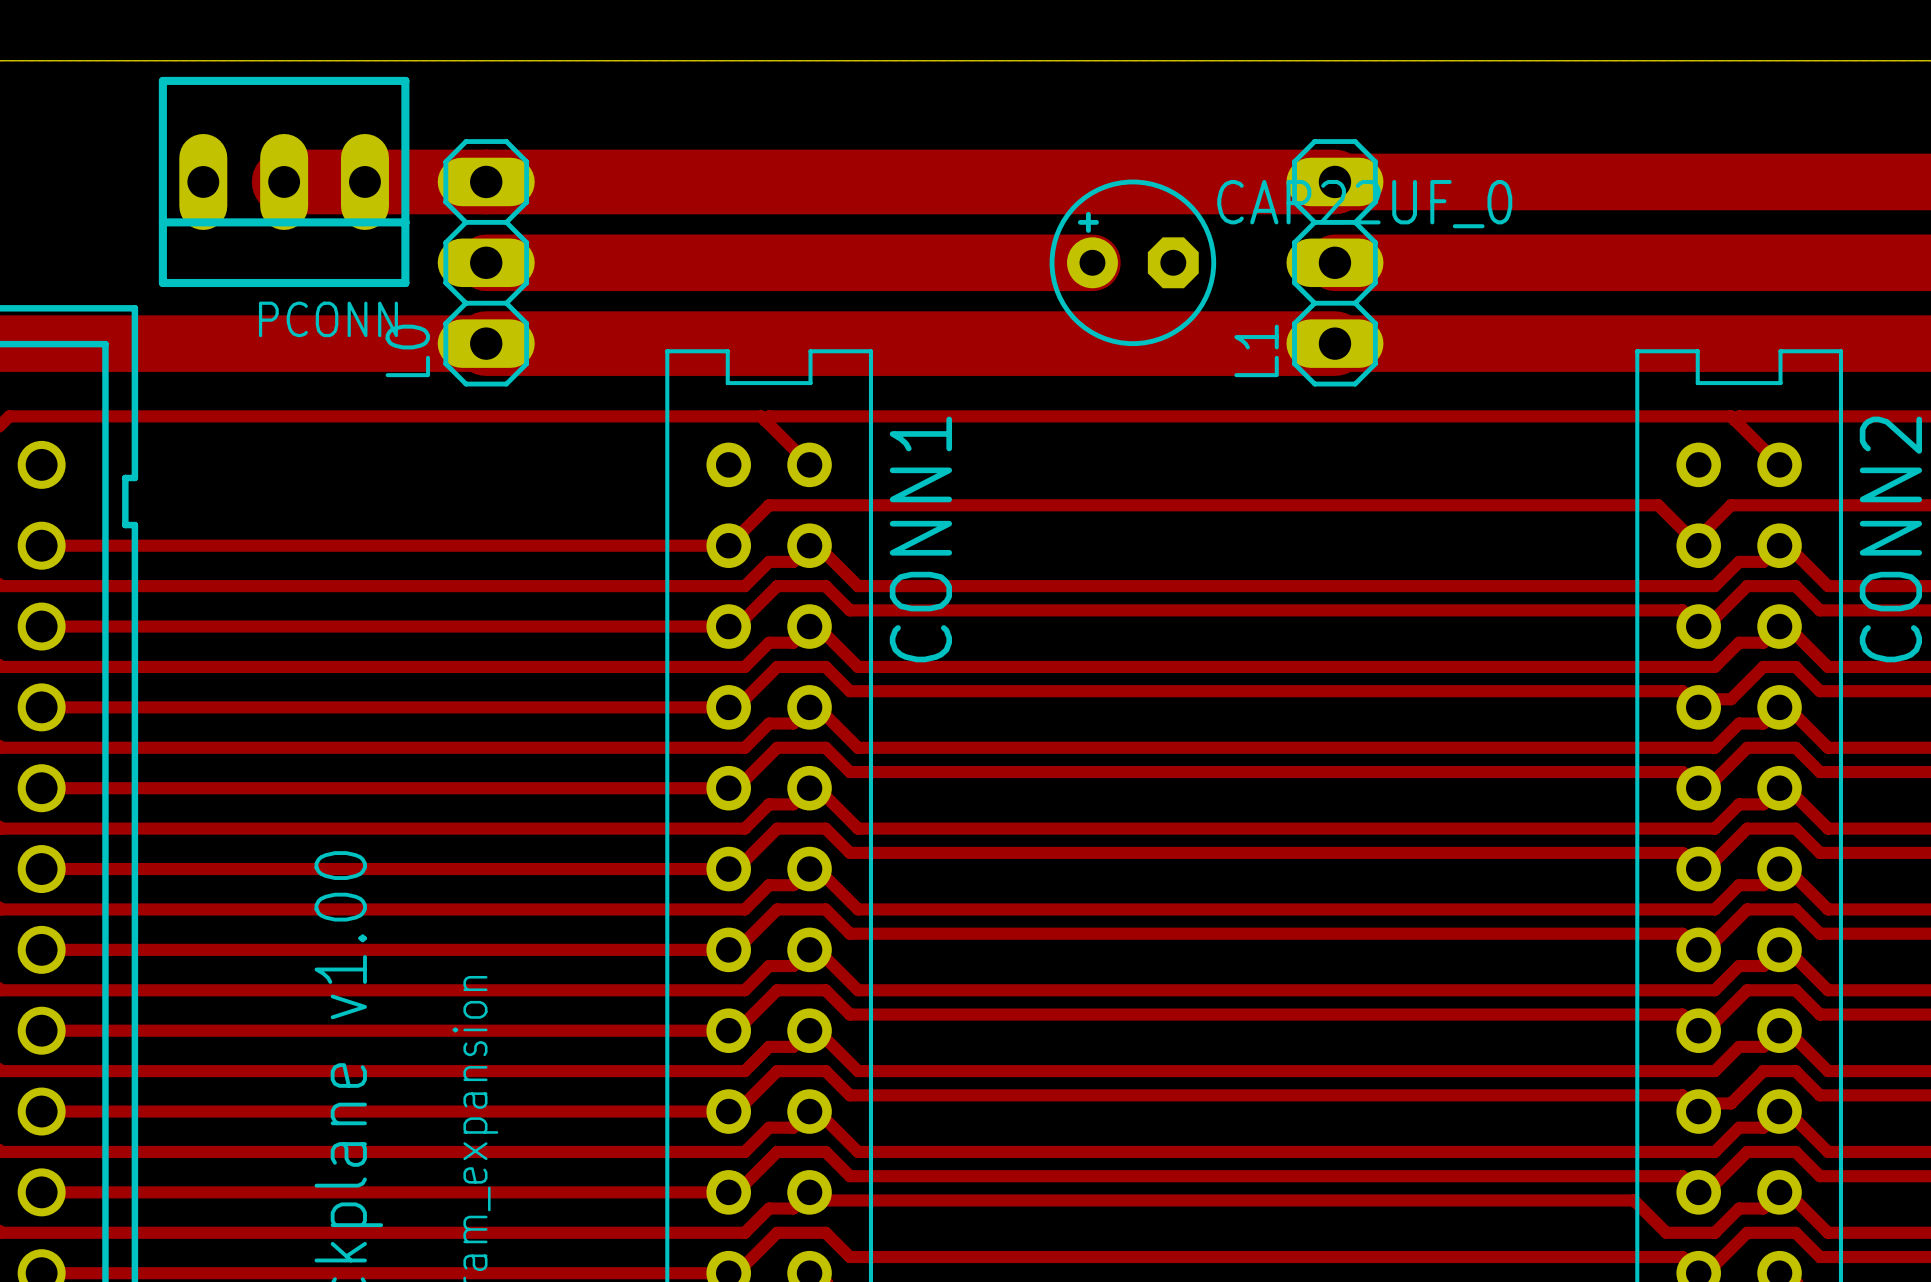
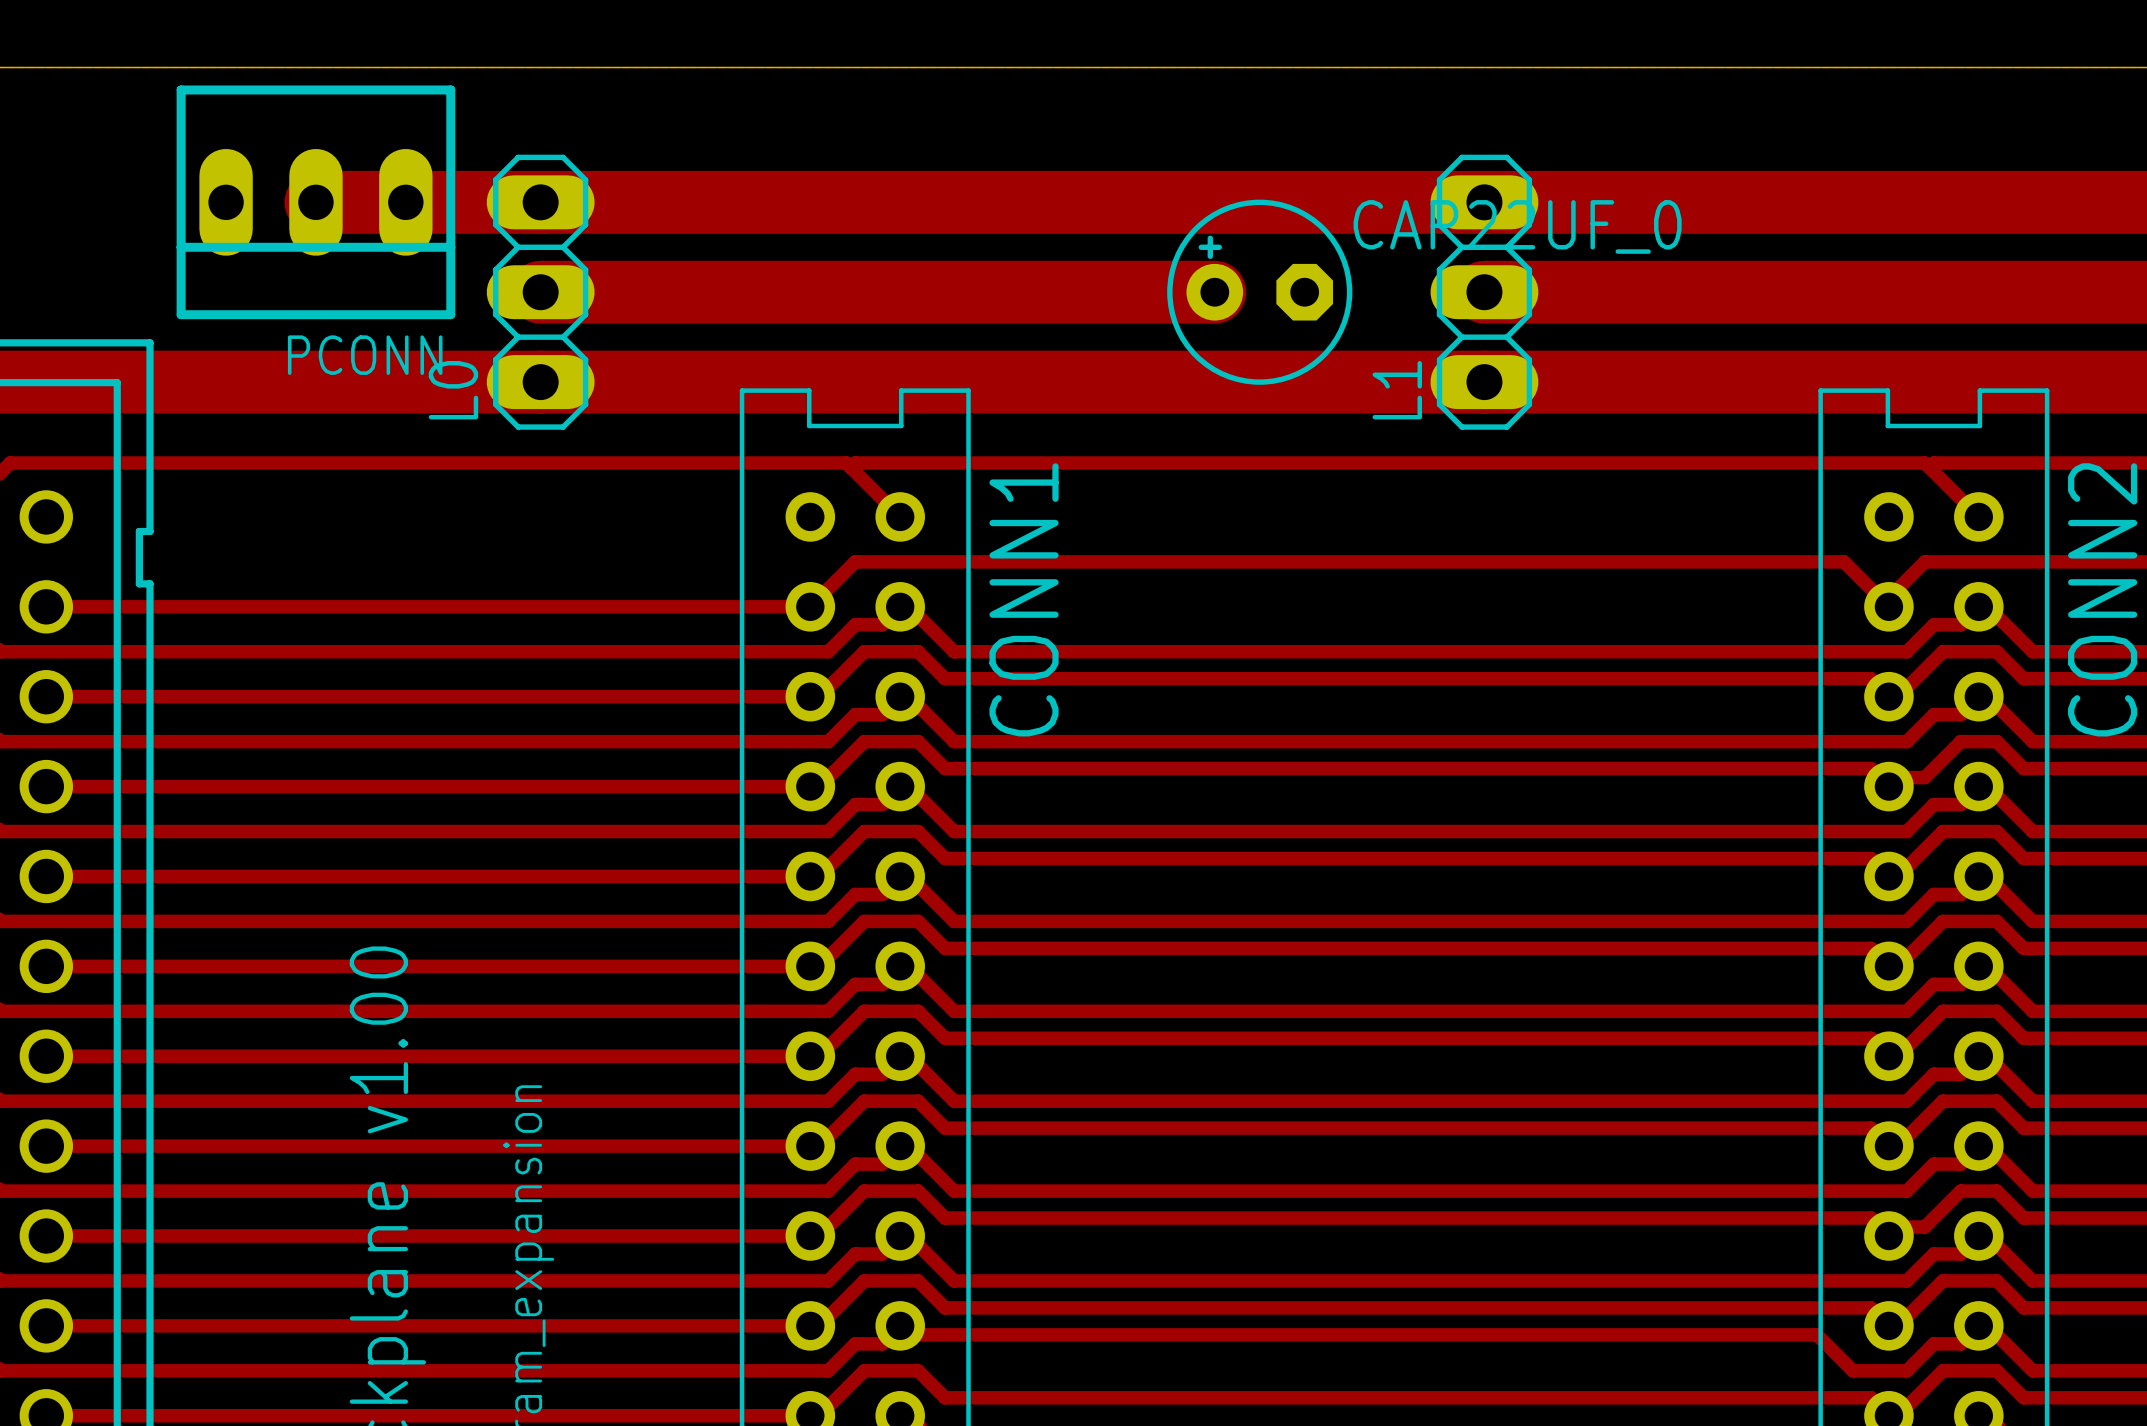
track width: thick (284, 181) (1334, 181) -> thin (315, 202) (1484, 202)
track width: thick (486, 343) (1334, 343) -> thin (540, 382) (1484, 382)

